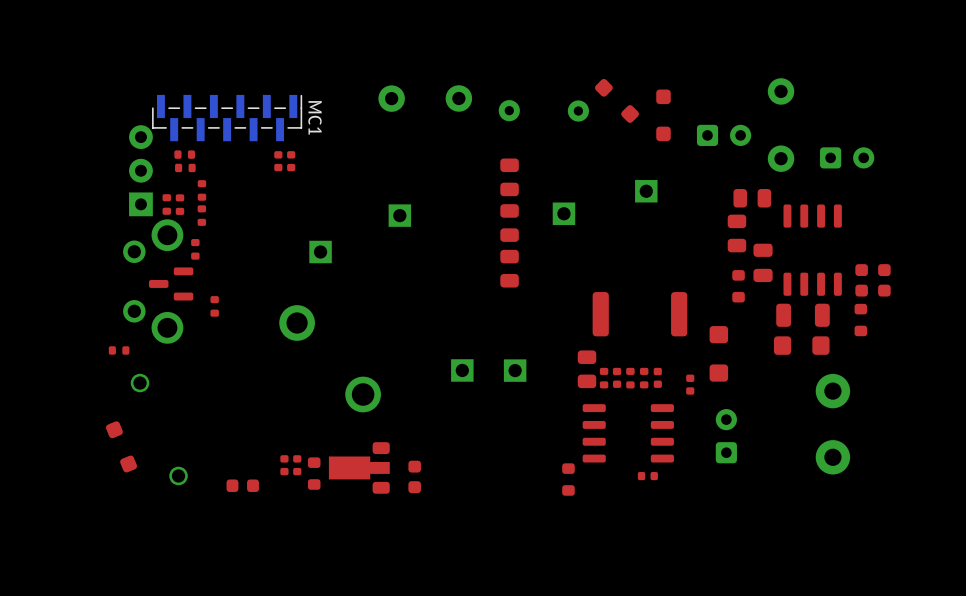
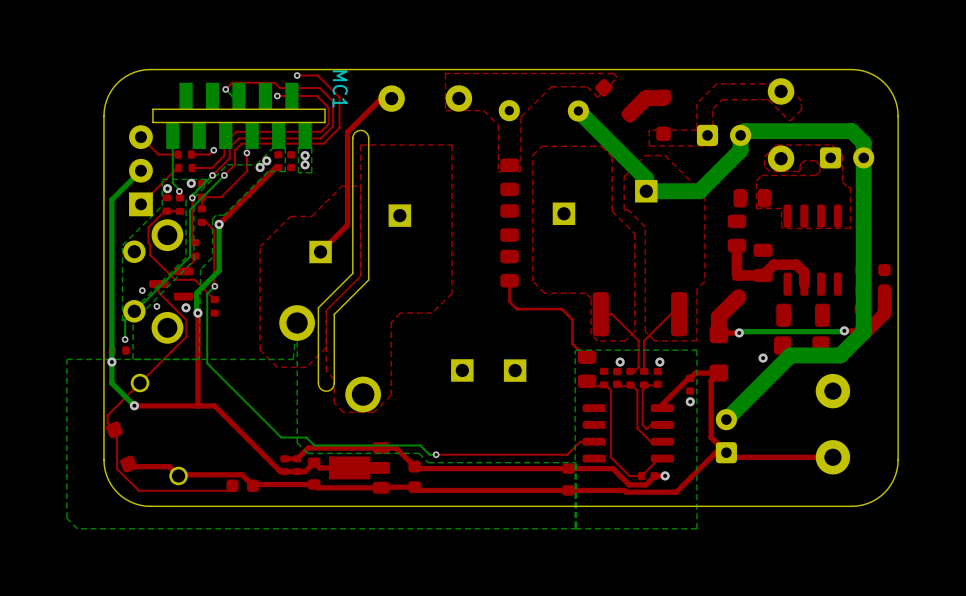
board edge: none -> (851, 69) (150, 69) (139, 70) (125, 76) (117, 83) (108, 95) (103, 115) (103, 460) (106, 475) (111, 484) (125, 499) (134, 503) (150, 506) (851, 506) (862, 505) (876, 499) (888, 488) (893, 480) (898, 460) (897, 110) (893, 95) (880, 79) (867, 72) (851, 69)
top zone outline: none -> (613, 73) (617, 77) (597, 97) (587, 86) (551, 86) (520, 117) (520, 171) (498, 171) (498, 125) (483, 110) (445, 110) (445, 73) (613, 73)
top track: none -> (297, 75) (317, 75) (339, 97) (339, 127) (323, 143) (241, 143) (235, 150) (235, 164) (224, 175)
via: none -> (297, 75)
top zone outline: none -> (784, 83) (801, 100) (801, 109) (790, 120) (768, 99) (722, 99) (712, 108) (712, 145) (649, 145) (649, 130) (696, 130) (696, 103) (716, 83) (784, 83)
top track: none -> (225, 89) (232, 82) (274, 82) (280, 88) (319, 88) (332, 101) (332, 126) (321, 138) (238, 138) (229, 147) (229, 158) (212, 175)
bottom track: none -> (225, 89) (232, 96) (238, 96)
via: none -> (225, 89)
MC1 footprint: [152, 94, 303, 142] -> [152, 82, 326, 149]
top track: none -> (277, 96) (316, 96) (328, 107) (328, 124) (320, 131) (236, 131) (224, 143) (224, 155) (212, 167) (192, 167)
via: none -> (277, 96)
top track: none -> (391, 98) (381, 98) (347, 132) (347, 225) (320, 252)
top track: none -> (663, 98) (645, 98) (630, 114)
bottom track: none -> (578, 111) (646, 178) (646, 191) (699, 191) (740, 150) (740, 135) (744, 131) (851, 131) (863, 142) (863, 332) (840, 355) (790, 355) (726, 419)
MC1 name position: MC1 (315, 117) -> MC1 (340, 89)
bottom track: none -> (172, 135) (172, 183) (179, 191)
top track: none -> (140, 137) (158, 154) (177, 154)
board edge: none -> (368, 138) (368, 280) (334, 314) (334, 384) (331, 389) (325, 391) (321, 389) (318, 384) (318, 307) (352, 273) (352, 137) (355, 132) (361, 130) (367, 133) (368, 138)
top zone outline: none -> (452, 144) (360, 144) (360, 276) (326, 310) (326, 371) (334, 379) (334, 403) (343, 412) (373, 412) (391, 395) (391, 322) (400, 313) (432, 313) (452, 293) (452, 144)
top zone outline: none -> (831, 144) (776, 144) (764, 156) (764, 166) (769, 171) (798, 171) (800, 164) (804, 160) (816, 160) (820, 164) (820, 171) (816, 175) (761, 175) (756, 180) (756, 208) (781, 208) (782, 228) (850, 228) (850, 187) (842, 182) (842, 155) (831, 144)
top zone outline: none -> (601, 146) (542, 146) (532, 155) (532, 281) (544, 293) (585, 293) (591, 298) (591, 334) (597, 340) (625, 340) (634, 331) (634, 233) (612, 211) (612, 156) (601, 146)
bottom zone outline: none -> (311, 147) (298, 147) (298, 172) (311, 172) (311, 147)
top track: none -> (213, 150) (209, 154) (191, 154)
via: none -> (213, 150)
top track: none -> (246, 152) (246, 171) (221, 197) (201, 197) (201, 208)
via: none -> (246, 152)
via: none -> (305, 155)
top zone outline: none -> (665, 155) (704, 195) (704, 281) (696, 289) (696, 340) (654, 340) (645, 331) (645, 227) (628, 209) (624, 209) (624, 176) (645, 155) (665, 155)
via: none -> (266, 160)
via: none -> (305, 164)
top track: none -> (178, 167) (140, 204)
via: none -> (260, 167)
top track: none -> (278, 167) (275, 167) (219, 224)
bottom track: none -> (140, 170) (111, 199) (111, 383) (134, 405)
bottom track: none -> (212, 175) (192, 195) (192, 197)
via: none -> (212, 175)
bottom track: none -> (224, 175) (189, 209) (189, 256) (125, 320) (125, 339)
via: none -> (224, 175)
bottom zone outline: none -> (207, 179) (162, 179) (162, 205) (122, 245) (122, 321) (186, 257) (186, 200) (207, 179)
via: none -> (191, 183)
top zone outline: none -> (360, 186) (342, 186) (311, 216) (290, 216) (260, 246) (260, 350) (277, 367) (306, 367) (326, 347)
via: none -> (167, 188)
via: none -> (179, 191)
top track: none -> (192, 197) (192, 239) (195, 242)
via: none -> (192, 197)
top track: none -> (179, 211) (164, 211) (148, 227) (150, 255) (175, 279) (194, 279) (214, 299)
top track: none -> (201, 222) (206, 222) (214, 230) (214, 286)
bottom track: none -> (219, 224) (219, 270) (196, 293) (197, 313)
via: none -> (219, 224)
top track: none -> (736, 245) (736, 273) (738, 275) (763, 275) (773, 264) (796, 264) (804, 272) (804, 284)
top track: none -> (195, 256) (195, 259) (183, 271)
top track: none -> (509, 280) (509, 301) (516, 309) (561, 309) (572, 319) (572, 344) (587, 358)
top track: none -> (158, 283) (158, 292) (186, 320) (186, 336) (107, 415) (107, 423) (117, 432) (117, 468) (138, 490) (227, 490) (232, 485)
bottom track: none -> (214, 286) (207, 293) (207, 363) (281, 437) (306, 437) (314, 445) (420, 445) (429, 454) (436, 454)
via: none -> (214, 286)
via: none -> (142, 290)
top track: none -> (884, 290) (884, 313) (867, 330) (844, 330)
top track: none -> (738, 297) (718, 316) (718, 334) (720, 332) (739, 332)
via: none -> (156, 306)
via: none -> (186, 307)
top track: none -> (197, 313) (197, 405)
via: none -> (197, 313)
top track: none -> (600, 314) (612, 314) (638, 340) (638, 367) (633, 372)
top track: none -> (679, 314) (670, 314) (643, 340) (643, 369) (646, 372)
bottom zone outline: none -> (297, 322) (293, 359) (66, 359) (66, 518) (77, 528) (696, 528) (696, 350) (575, 351) (575, 527) (576, 528) (576, 463) (575, 462) (428, 462) (418, 453) (307, 453) (297, 442) (297, 322)
bottom track: none -> (844, 330) (739, 332)
via: none -> (844, 330)
via: none -> (739, 332)
via: none -> (125, 339)
via: none -> (763, 358)
bottom zone outline: none -> (199, 359) (200, 269) (212, 257) (212, 219) (216, 215) (224, 215) (268, 171) (285, 171) (285, 147) (273, 147) (256, 164) (227, 164) (193, 197) (193, 260) (133, 322) (133, 359)
via: none -> (111, 362)
via: none -> (620, 362)
via: none -> (659, 362)
top track: none -> (587, 382) (590, 386) (606, 386) (610, 390) (610, 457) (629, 476) (641, 476) (659, 458) (662, 458)
top track: none -> (619, 385) (633, 386) (637, 390) (637, 428) (650, 441) (662, 441)
top track: none -> (660, 385) (647, 385) (642, 390) (642, 425) (647, 428) (651, 424) (662, 424)
via: none -> (690, 401)
top track: none -> (134, 405) (214, 405) (280, 471) (305, 471) (314, 462) (319, 467) (380, 467)
via: none -> (134, 405)
top track: none -> (662, 408) (662, 404) (695, 373) (718, 373) (711, 380) (711, 437) (730, 457) (832, 457)
top track: none -> (594, 441) (580, 441) (567, 454) (436, 454)
top track: none -> (726, 452) (715, 452) (676, 492) (417, 490) (414, 487) (317, 487) (314, 484) (253, 485) (242, 474) (178, 475) (169, 466) (131, 466)
via: none -> (436, 454)
top track: none -> (284, 458) (297, 458) (308, 448) (396, 448) (416, 468) (612, 468) (629, 484) (646, 484) (654, 476) (665, 475)
via: none -> (665, 475)

